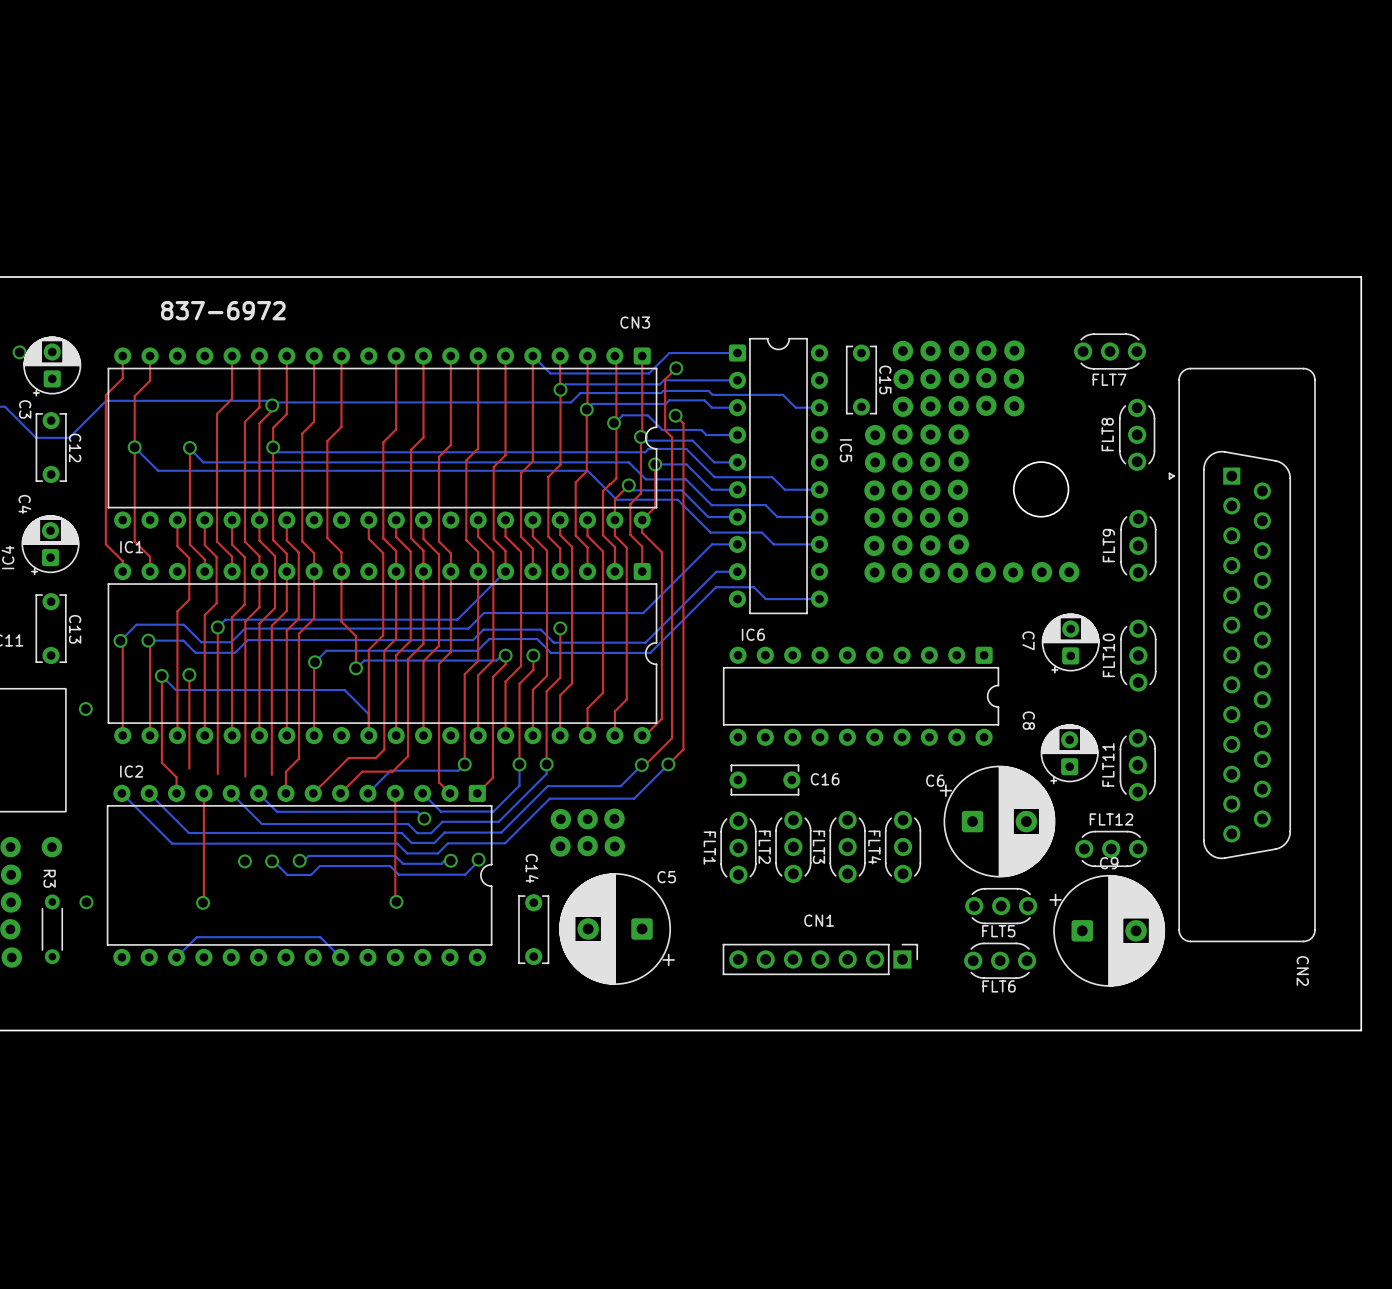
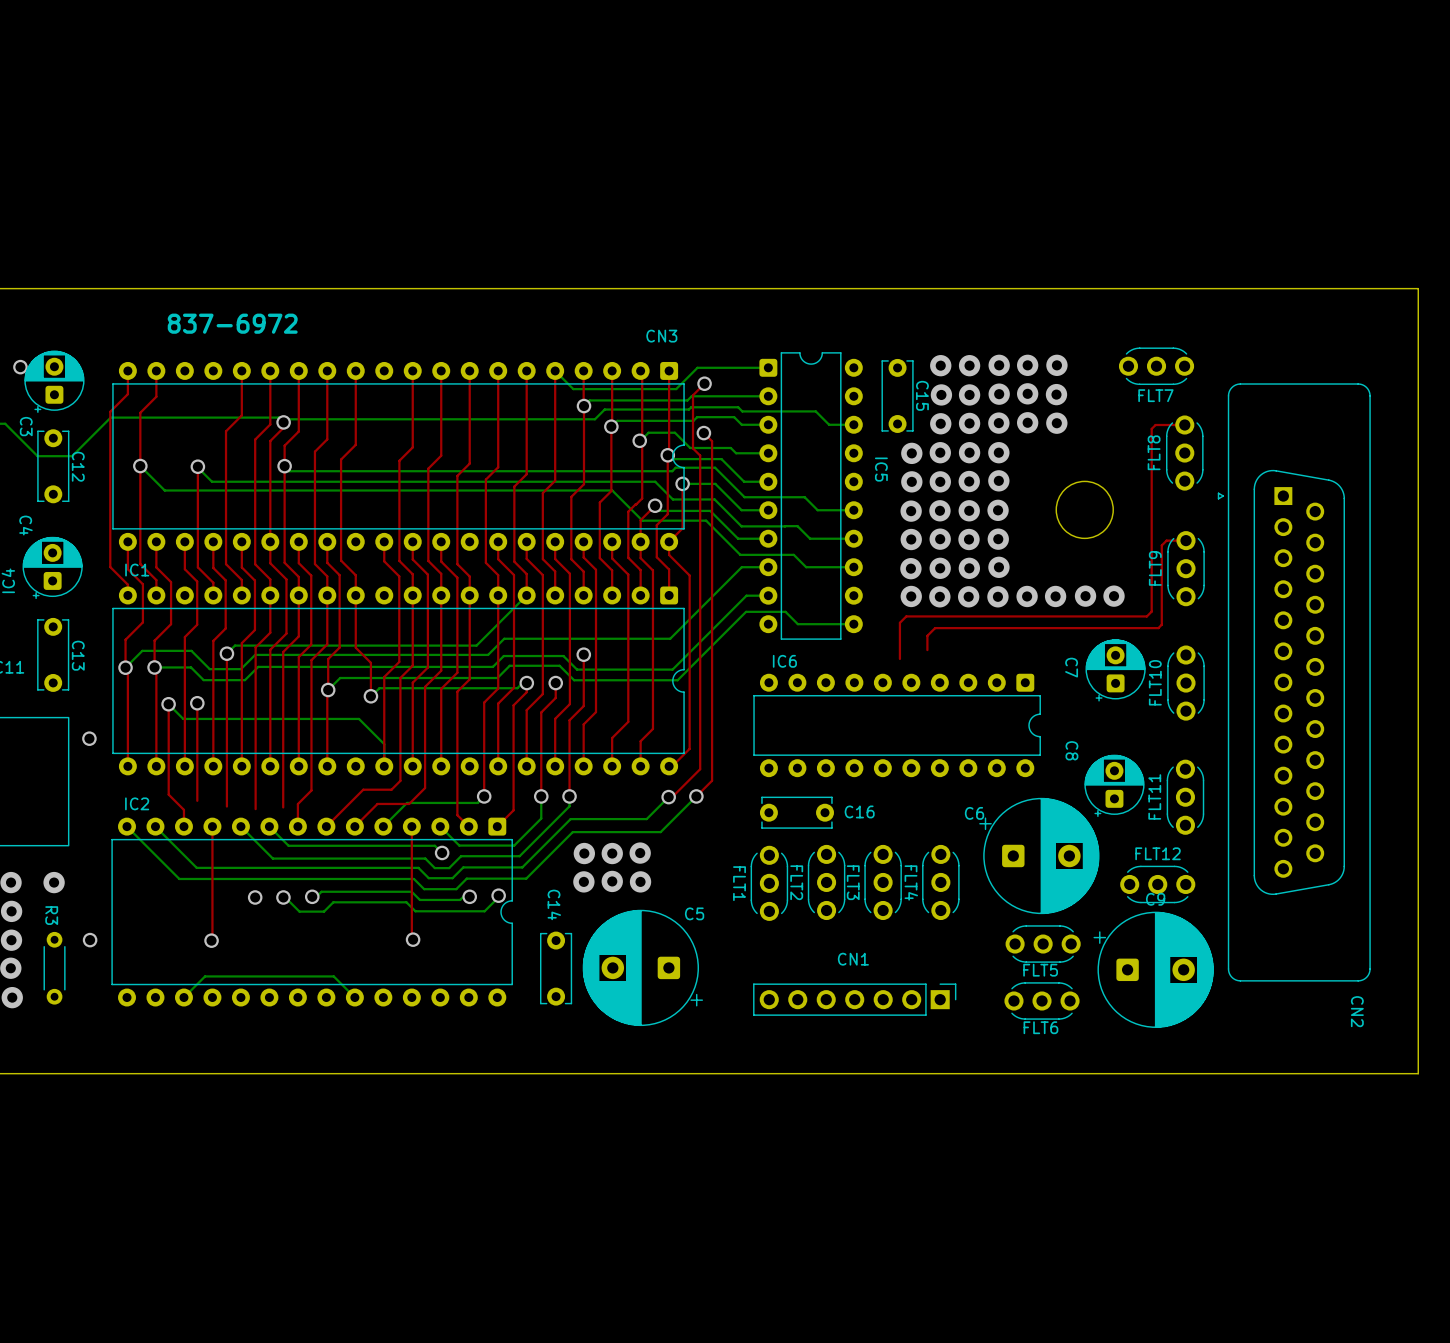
top track: none -> (1184, 425) (1155, 425) (1151, 428) (1151, 611) (1146, 616) (906, 616) (899, 622) (899, 658)
top track: none -> (1186, 540) (1166, 540) (1161, 545) (1161, 624) (1158, 628) (935, 628) (927, 635) (927, 650)
top track: none -> (127, 541) (127, 569) (142, 584) (142, 622) (125, 639) (125, 667)
top track: none -> (156, 541) (156, 567) (171, 582) (171, 624) (154, 640) (154, 667)
top track: none -> (327, 541) (327, 562) (339, 575) (339, 647) (328, 659) (328, 690)

